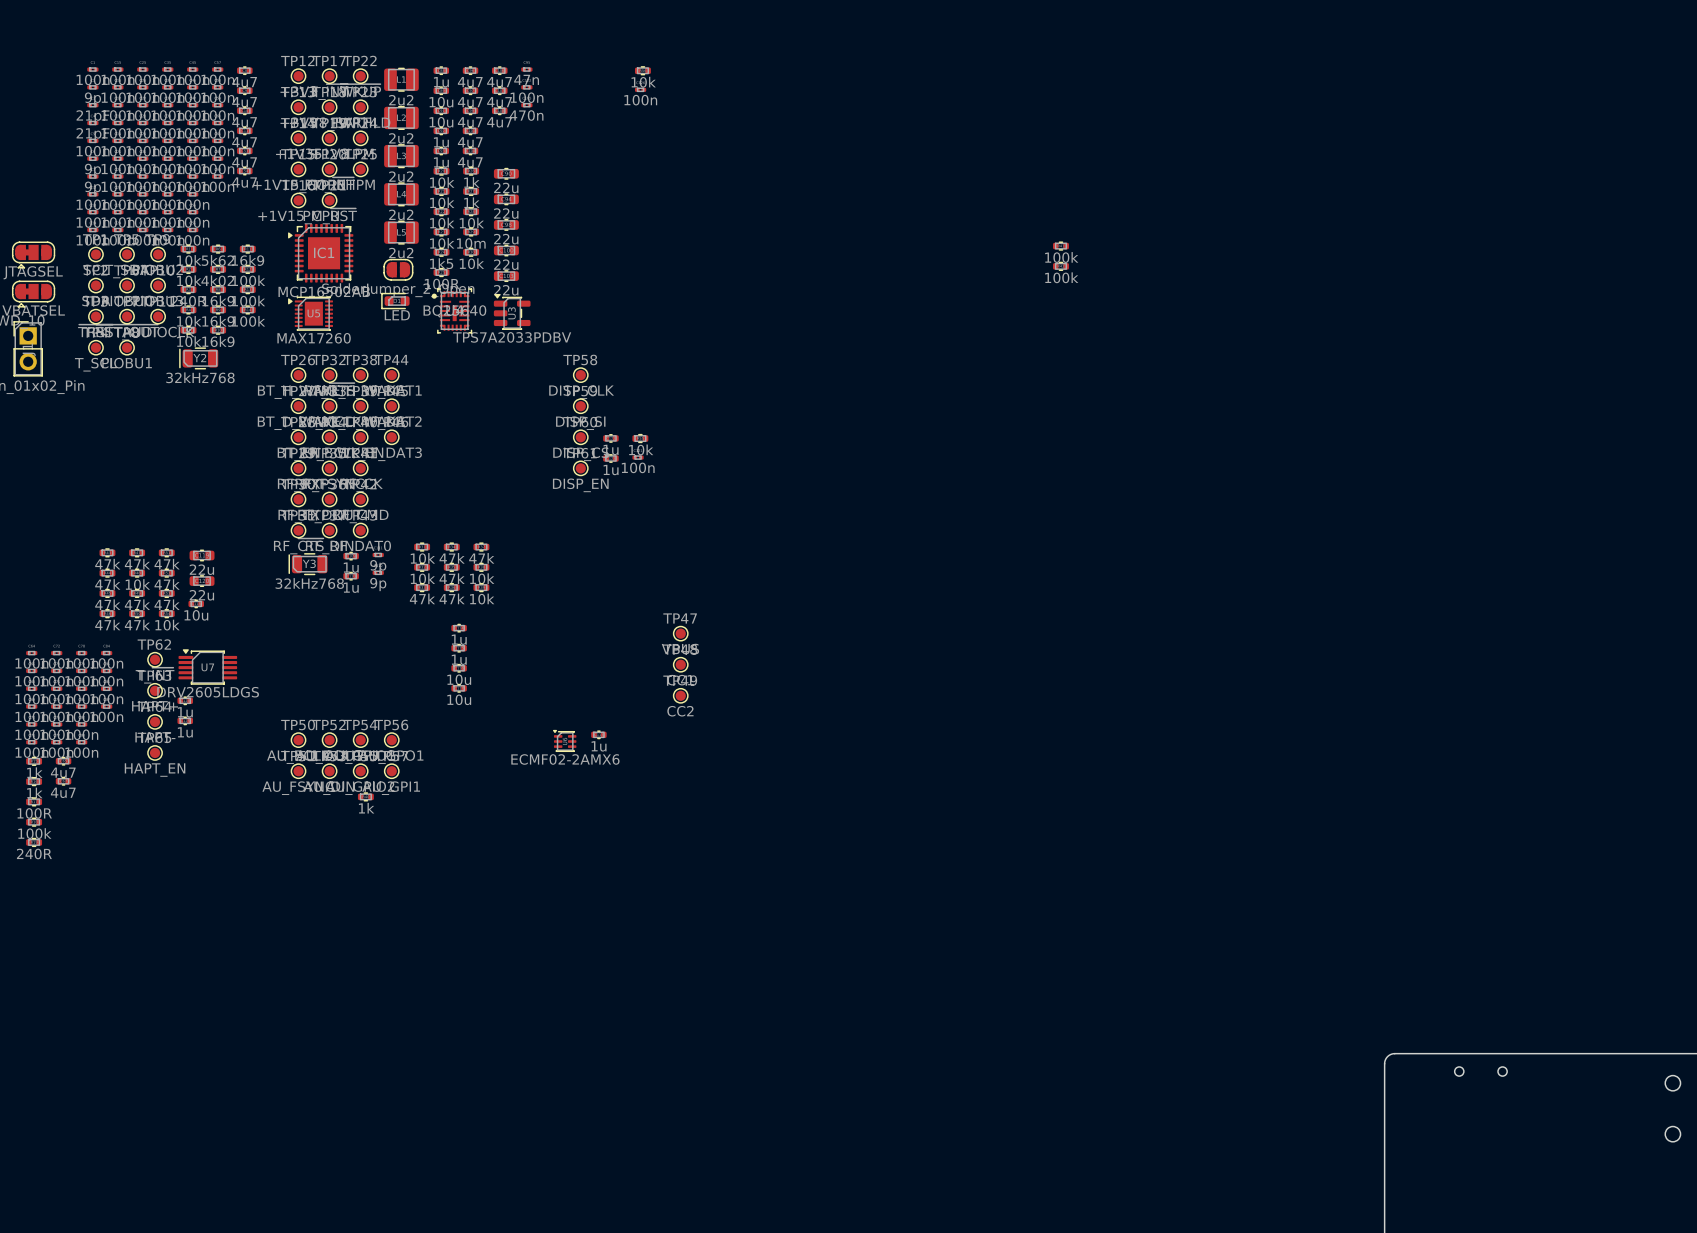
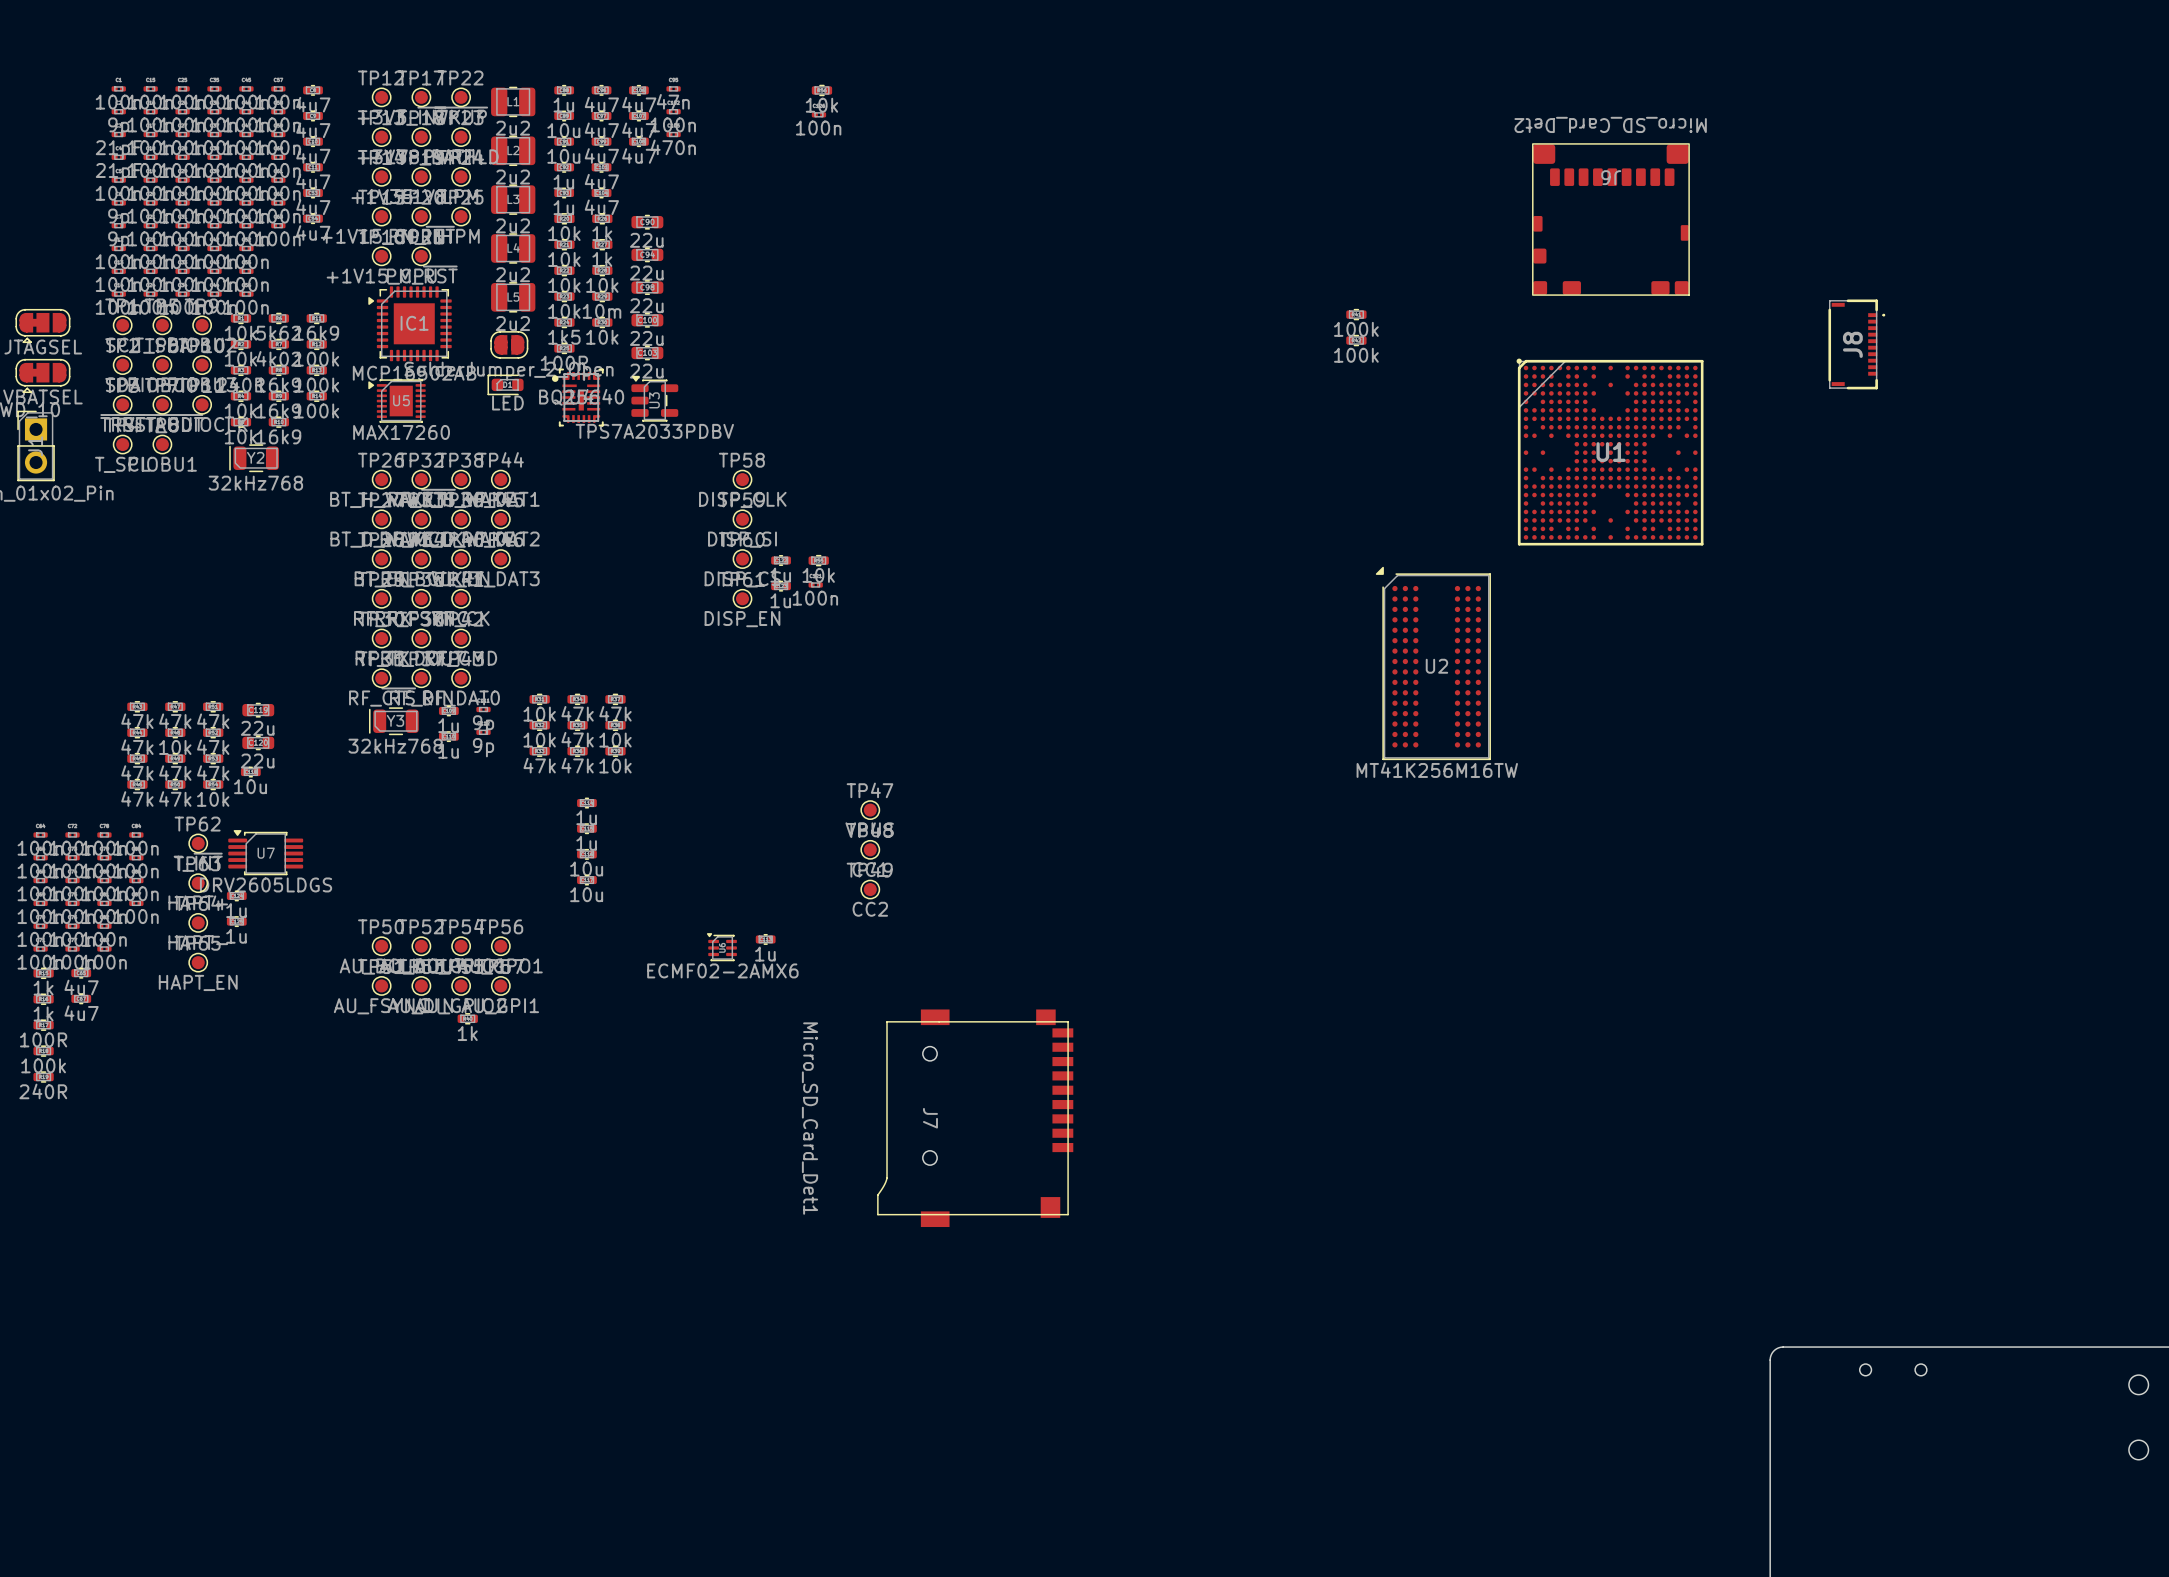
J6: none -> Micro_SD_Card_Det2 (1610, 219)
J8: none -> (1856, 344)
U1: none -> (1610, 452)
U2: none -> MT41K256M16TW (1433, 663)
J7: none -> Micro_SD_Card_Det1 (975, 1118)

